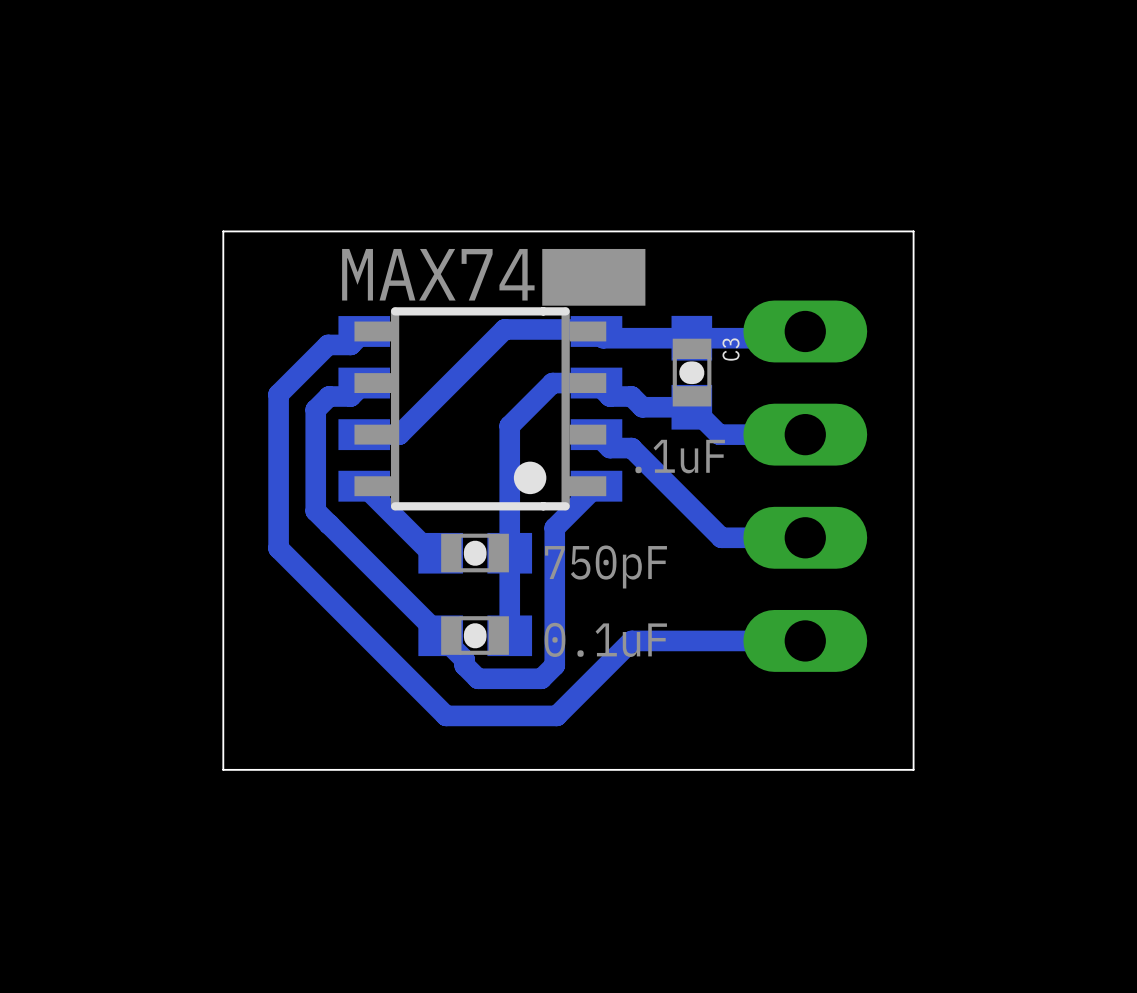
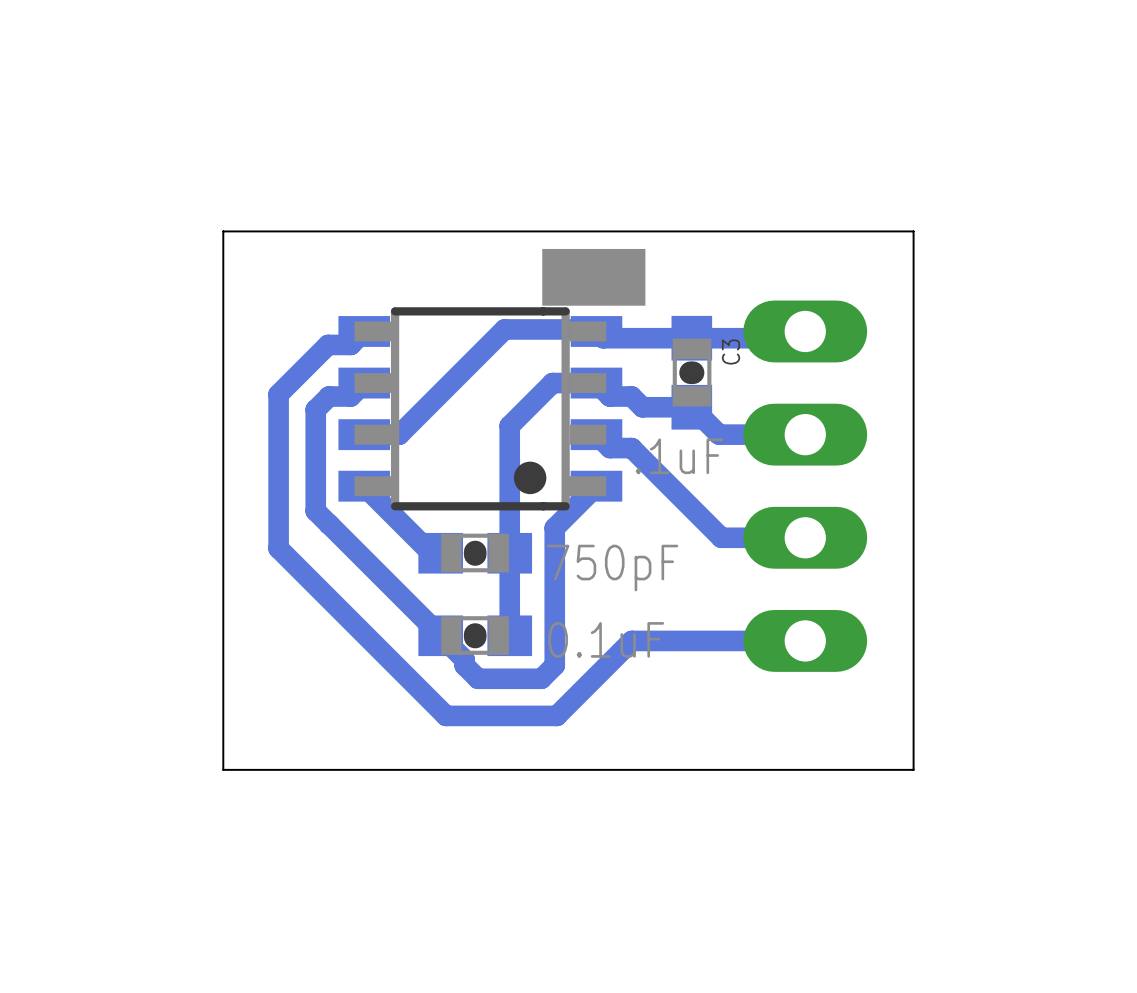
part value: MAX74 (438, 274) -> none

